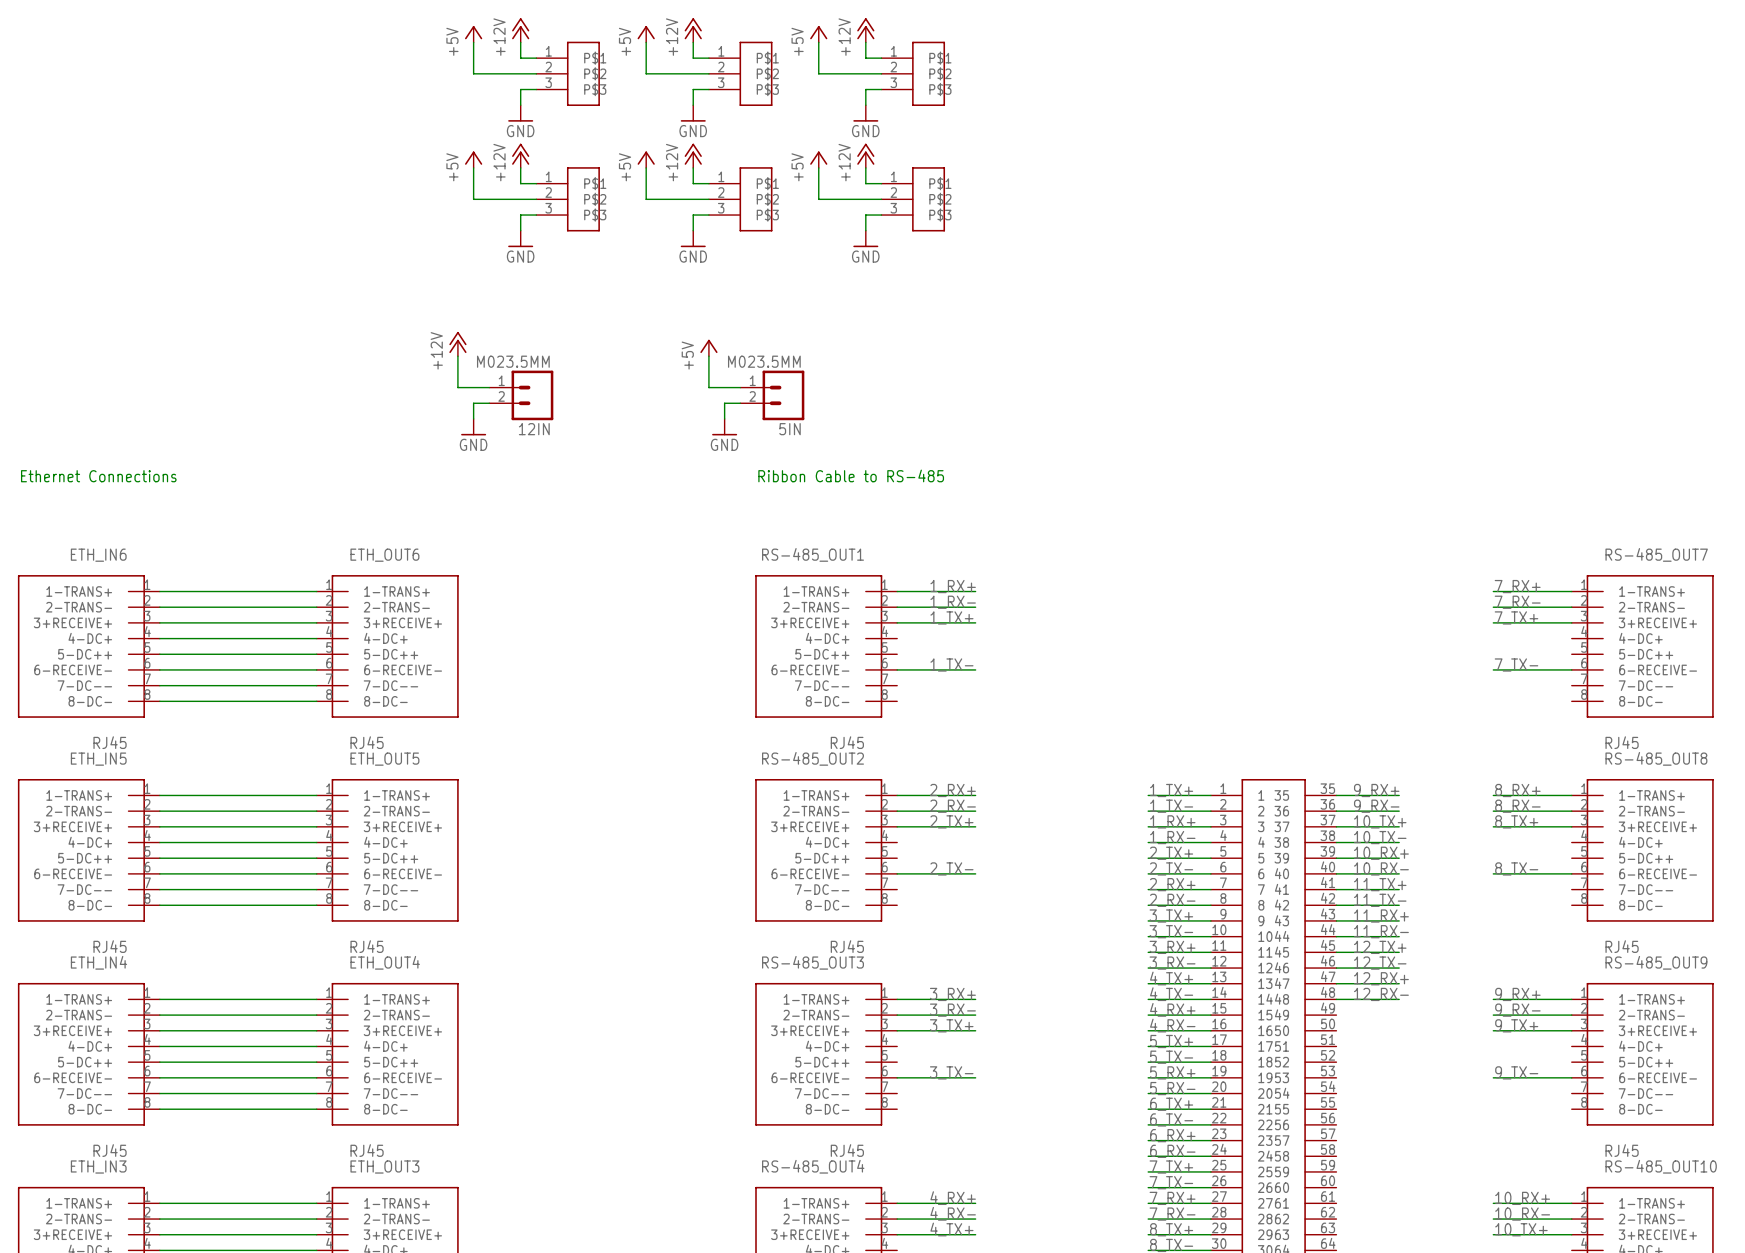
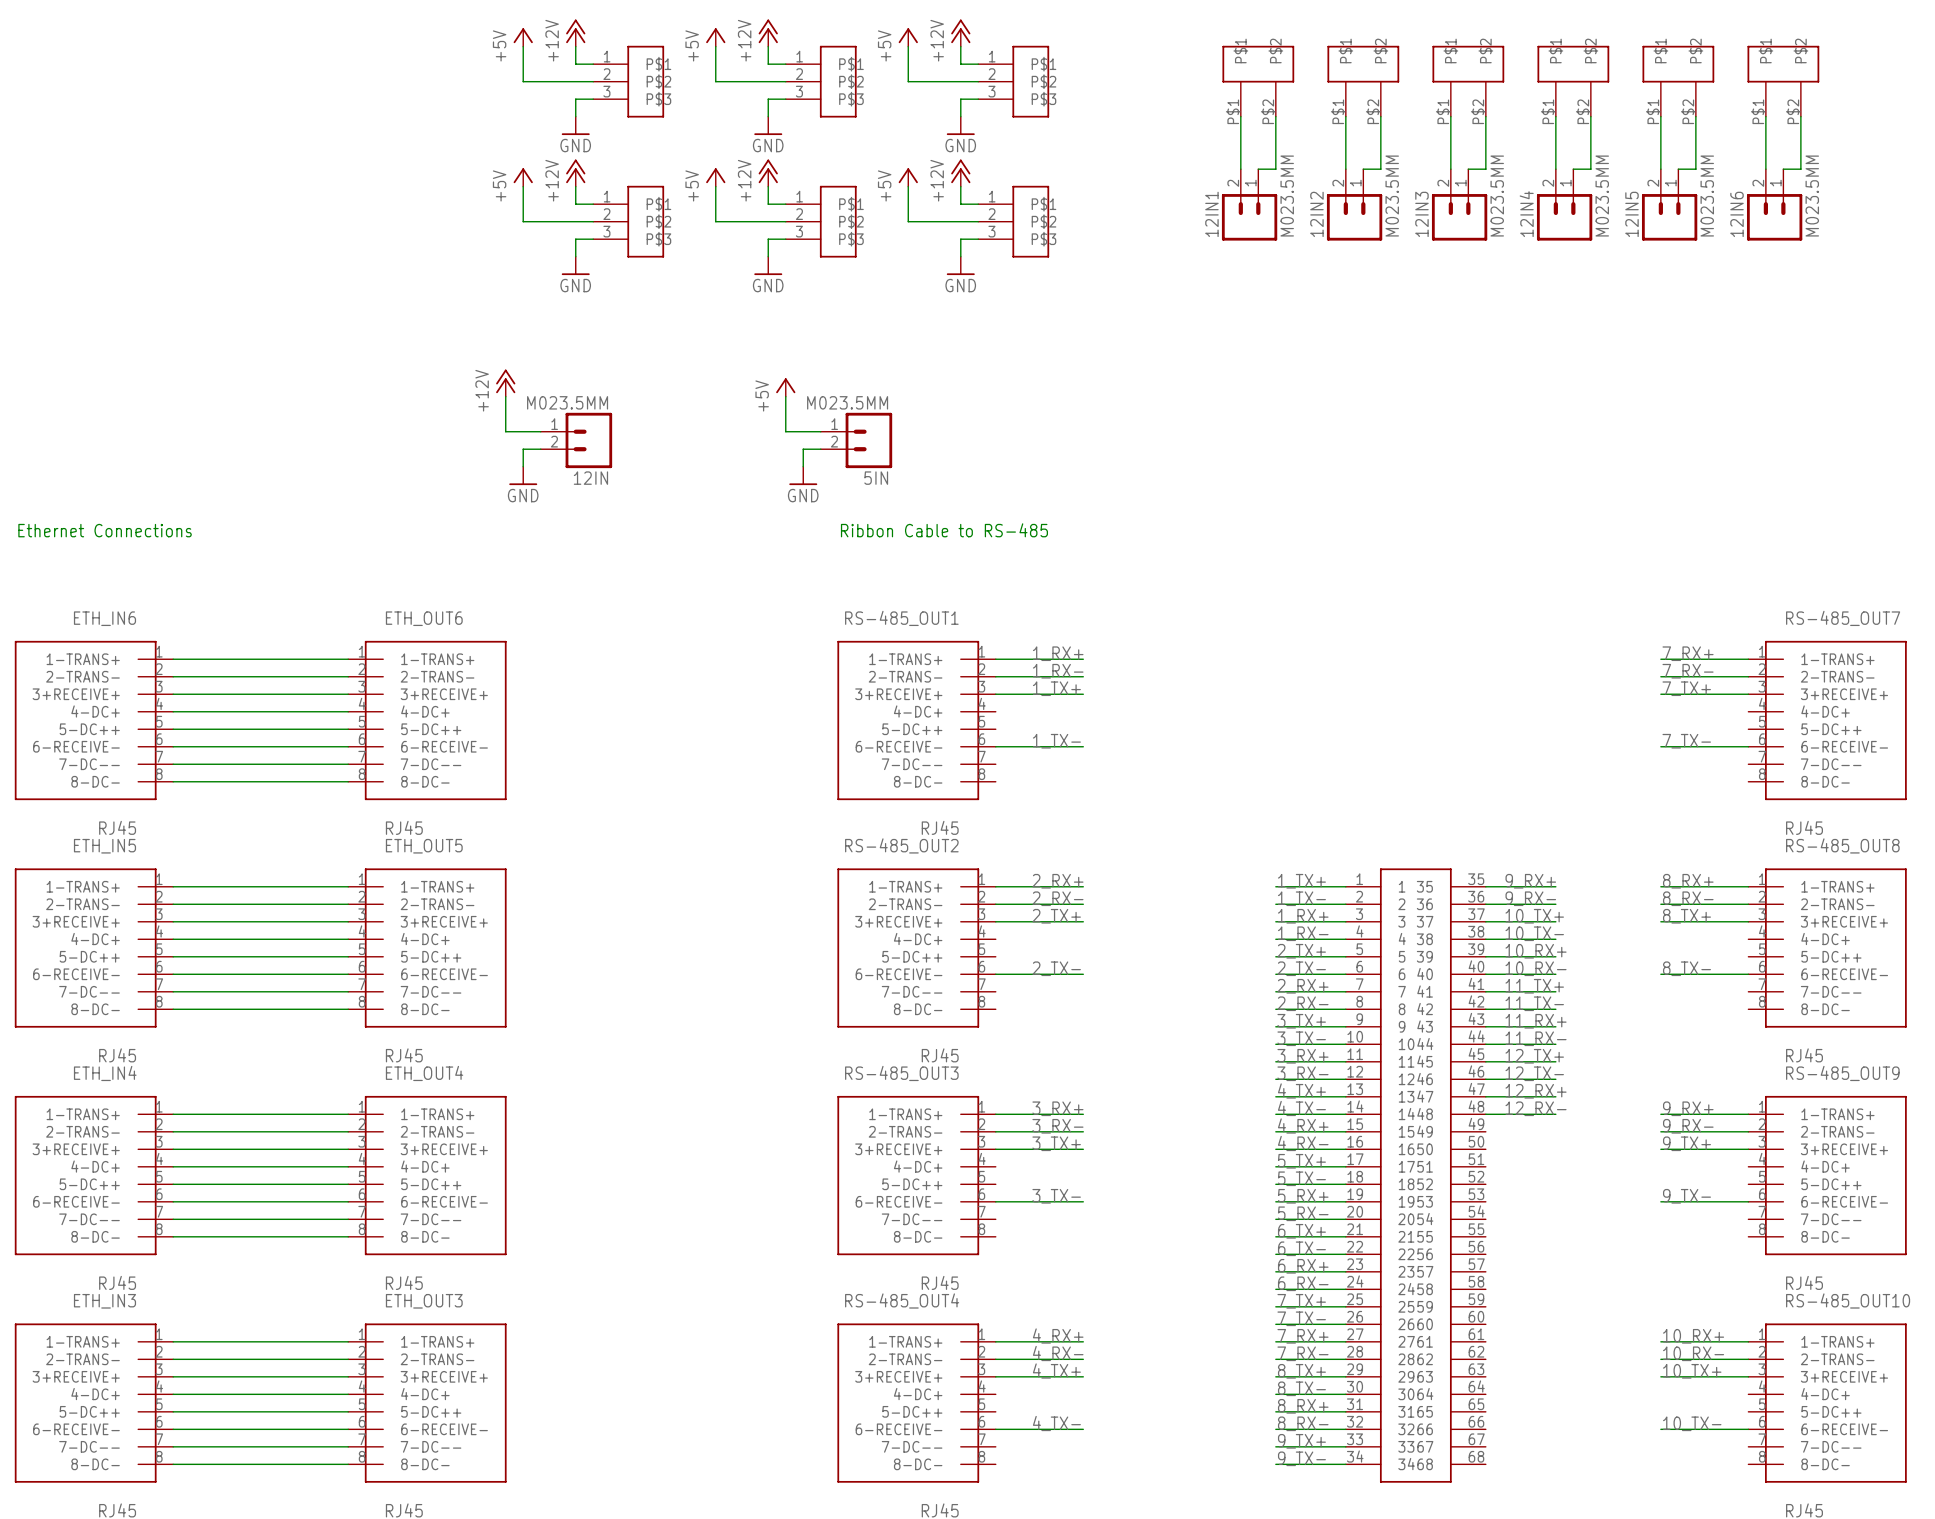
part: none -> (1258, 81)
part: none -> (1363, 81)
part: none -> (1468, 81)
part: none -> (1573, 81)
part: none -> (1678, 81)
part: none -> (1783, 81)
wire: none -> (1240, 116) (1240, 169)
wire: none -> (1275, 116) (1275, 169) (1258, 169)
wire: none -> (1345, 116) (1345, 169)
wire: none -> (1380, 116) (1380, 169) (1363, 169)
wire: none -> (1450, 116) (1450, 169)
wire: none -> (1485, 116) (1485, 169) (1468, 169)
wire: none -> (1555, 116) (1555, 169)
wire: none -> (1590, 116) (1590, 169) (1573, 169)
wire: none -> (1660, 116) (1660, 169)
wire: none -> (1695, 116) (1695, 169) (1678, 169)
wire: none -> (1765, 116) (1765, 169)
wire: none -> (1800, 116) (1800, 169) (1783, 169)
12IN1: none -> M023.5MM (1249, 204)
12IN2: none -> M023.5MM (1354, 204)
12IN3: none -> M023.5MM (1459, 204)
12IN4: none -> M023.5MM (1564, 204)
12IN5: none -> M023.5MM (1669, 204)
12IN6: none -> M023.5MM (1774, 204)

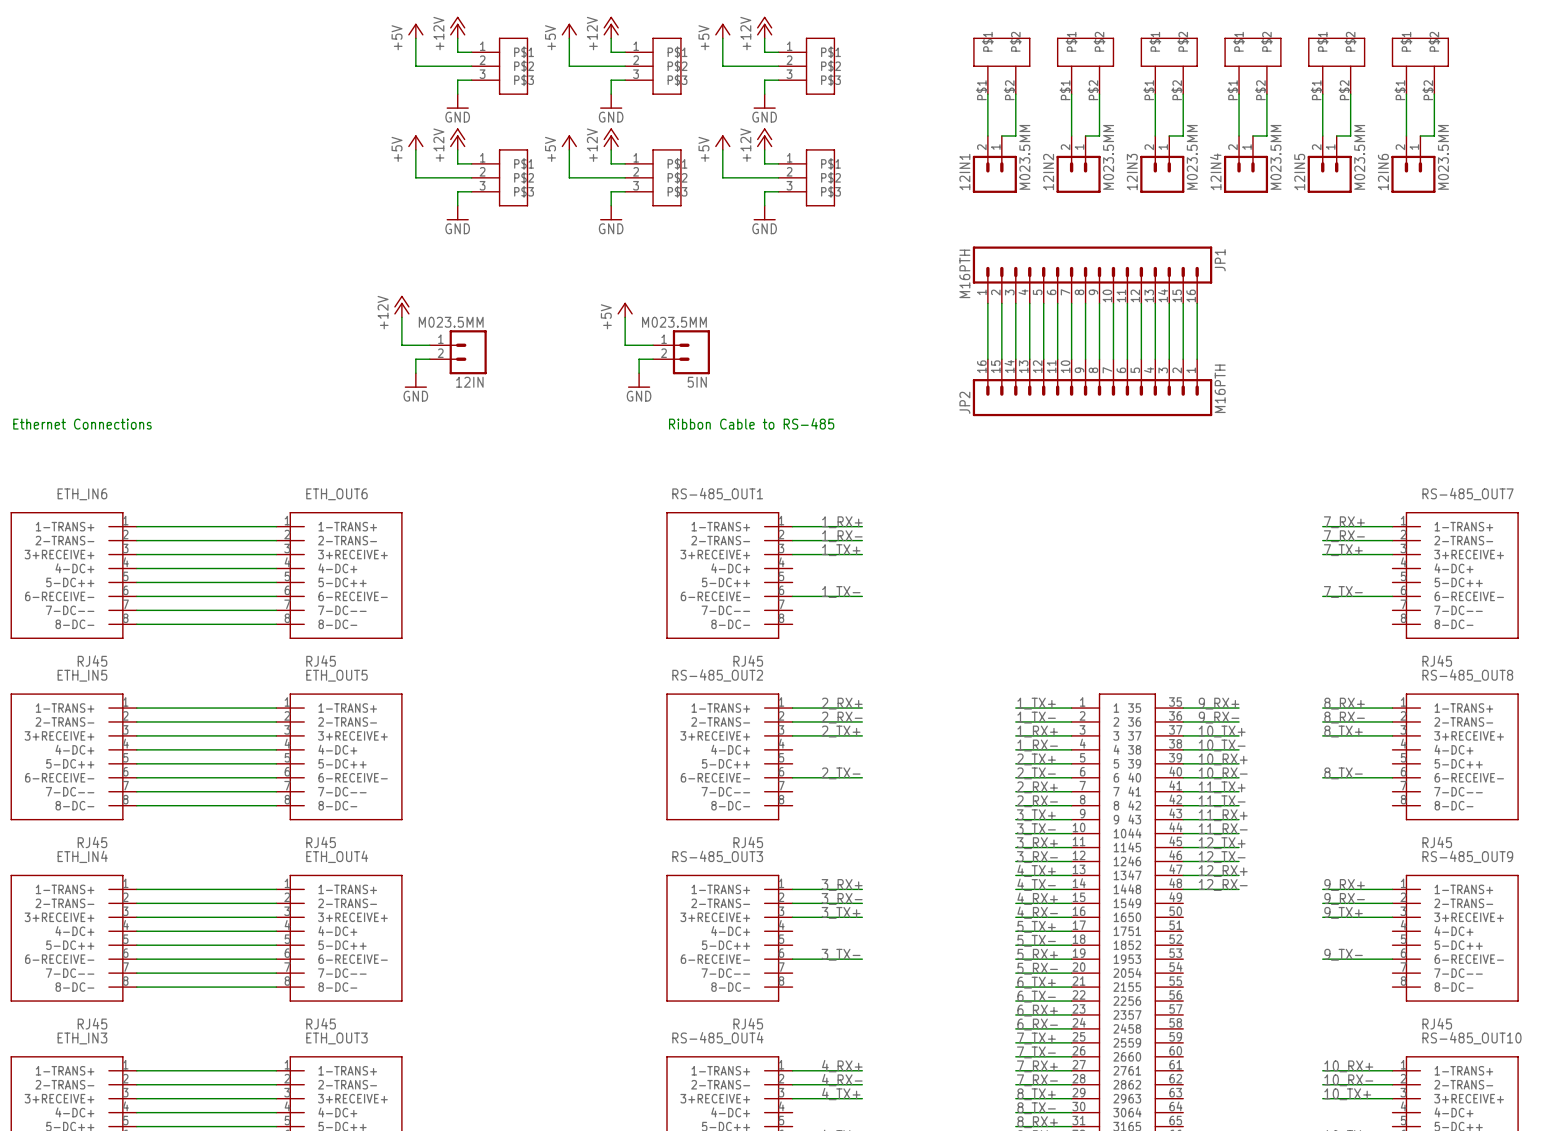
JP1: none -> M16PTH (1092, 274)
wire: none -> (987, 303) (987, 359)
wire: none -> (1001, 303) (1001, 359)
wire: none -> (1015, 303) (1015, 359)
wire: none -> (1029, 303) (1029, 359)
wire: none -> (1043, 303) (1043, 359)
wire: none -> (1057, 303) (1057, 359)
wire: none -> (1071, 303) (1071, 359)
wire: none -> (1085, 303) (1085, 359)
wire: none -> (1099, 303) (1099, 359)
wire: none -> (1113, 303) (1113, 359)
wire: none -> (1127, 303) (1127, 359)
wire: none -> (1141, 303) (1141, 359)
wire: none -> (1155, 303) (1155, 359)
wire: none -> (1169, 303) (1169, 359)
wire: none -> (1183, 303) (1183, 359)
wire: none -> (1197, 303) (1197, 359)
JP2: none -> M16PTH (1092, 387)

